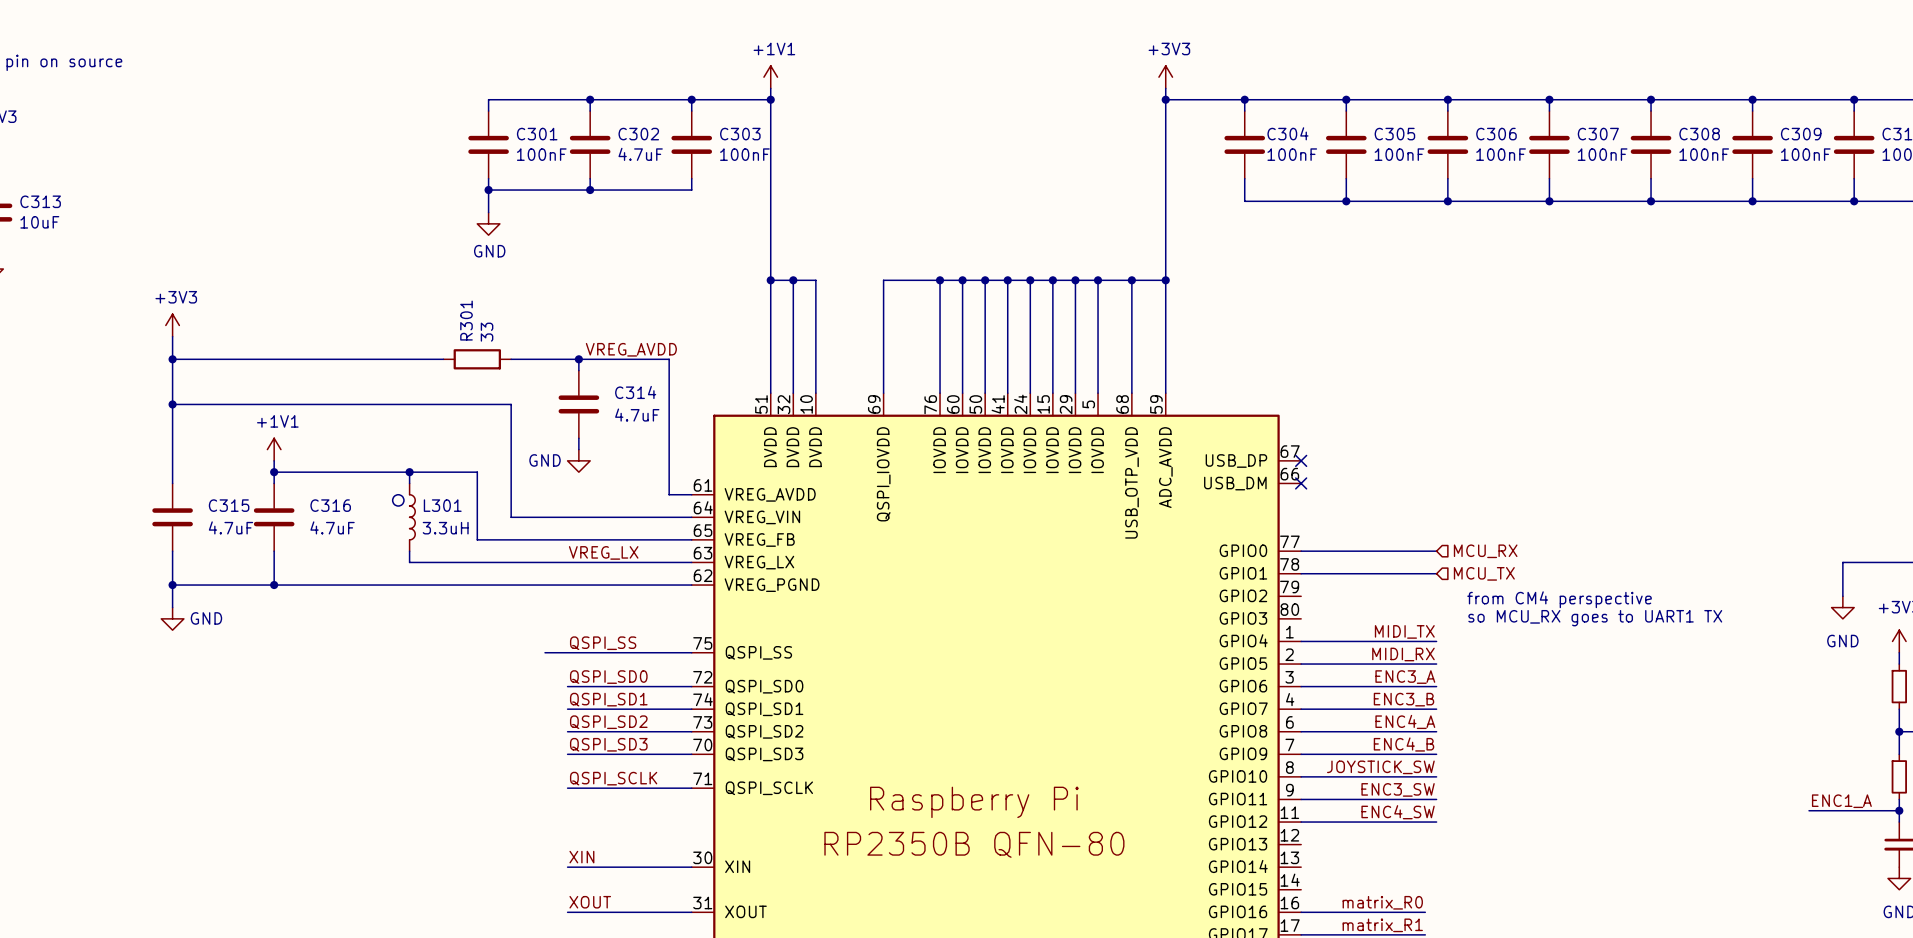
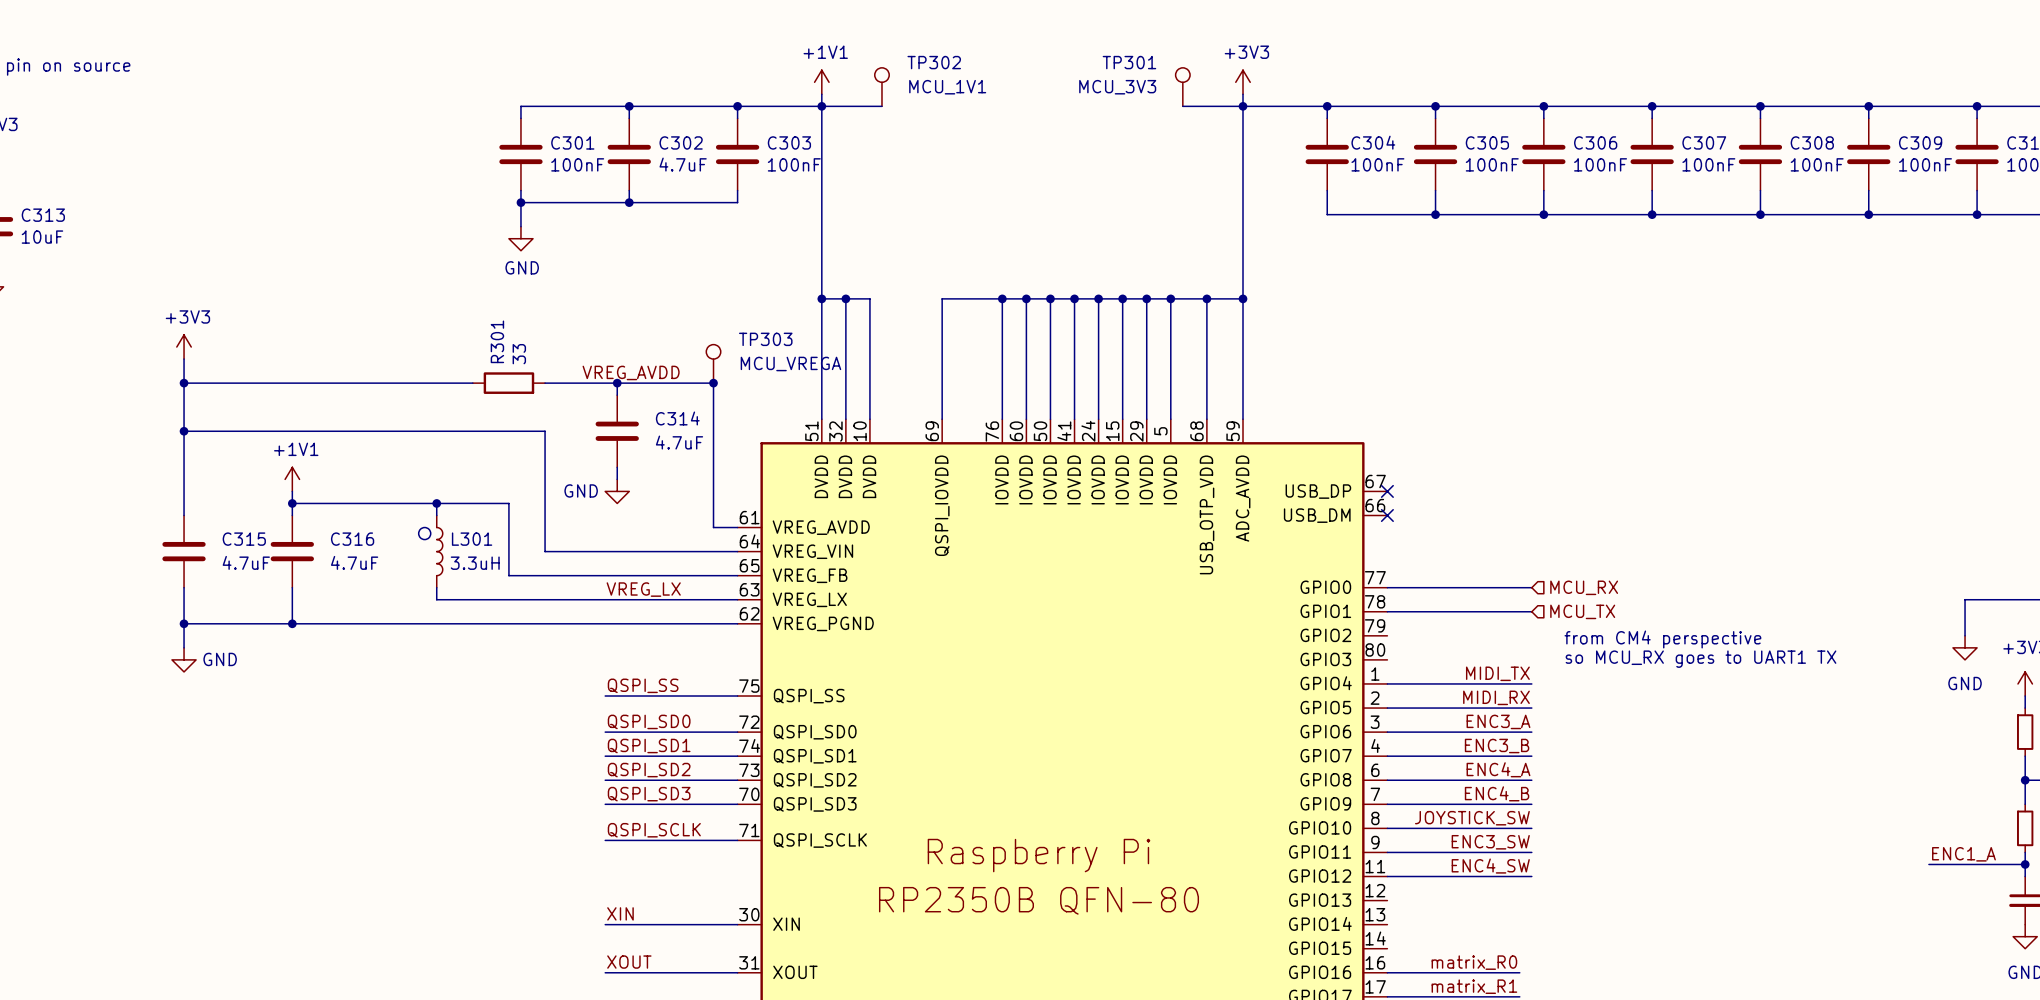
TP302: none -> MCU_1V1 (881, 87)
TP301: none -> MCU_3V3 (1182, 87)
wire: none -> (821, 106) (881, 106)
wire: none -> (1182, 106) (1243, 106)
TP303: none -> MCU_VREGA (713, 363)
label position: VREG_AVDD (631, 349) -> VREG_AVDD (631, 372)
junction: none -> (713, 383)
wire: (545, 652) (567, 652) -> none

